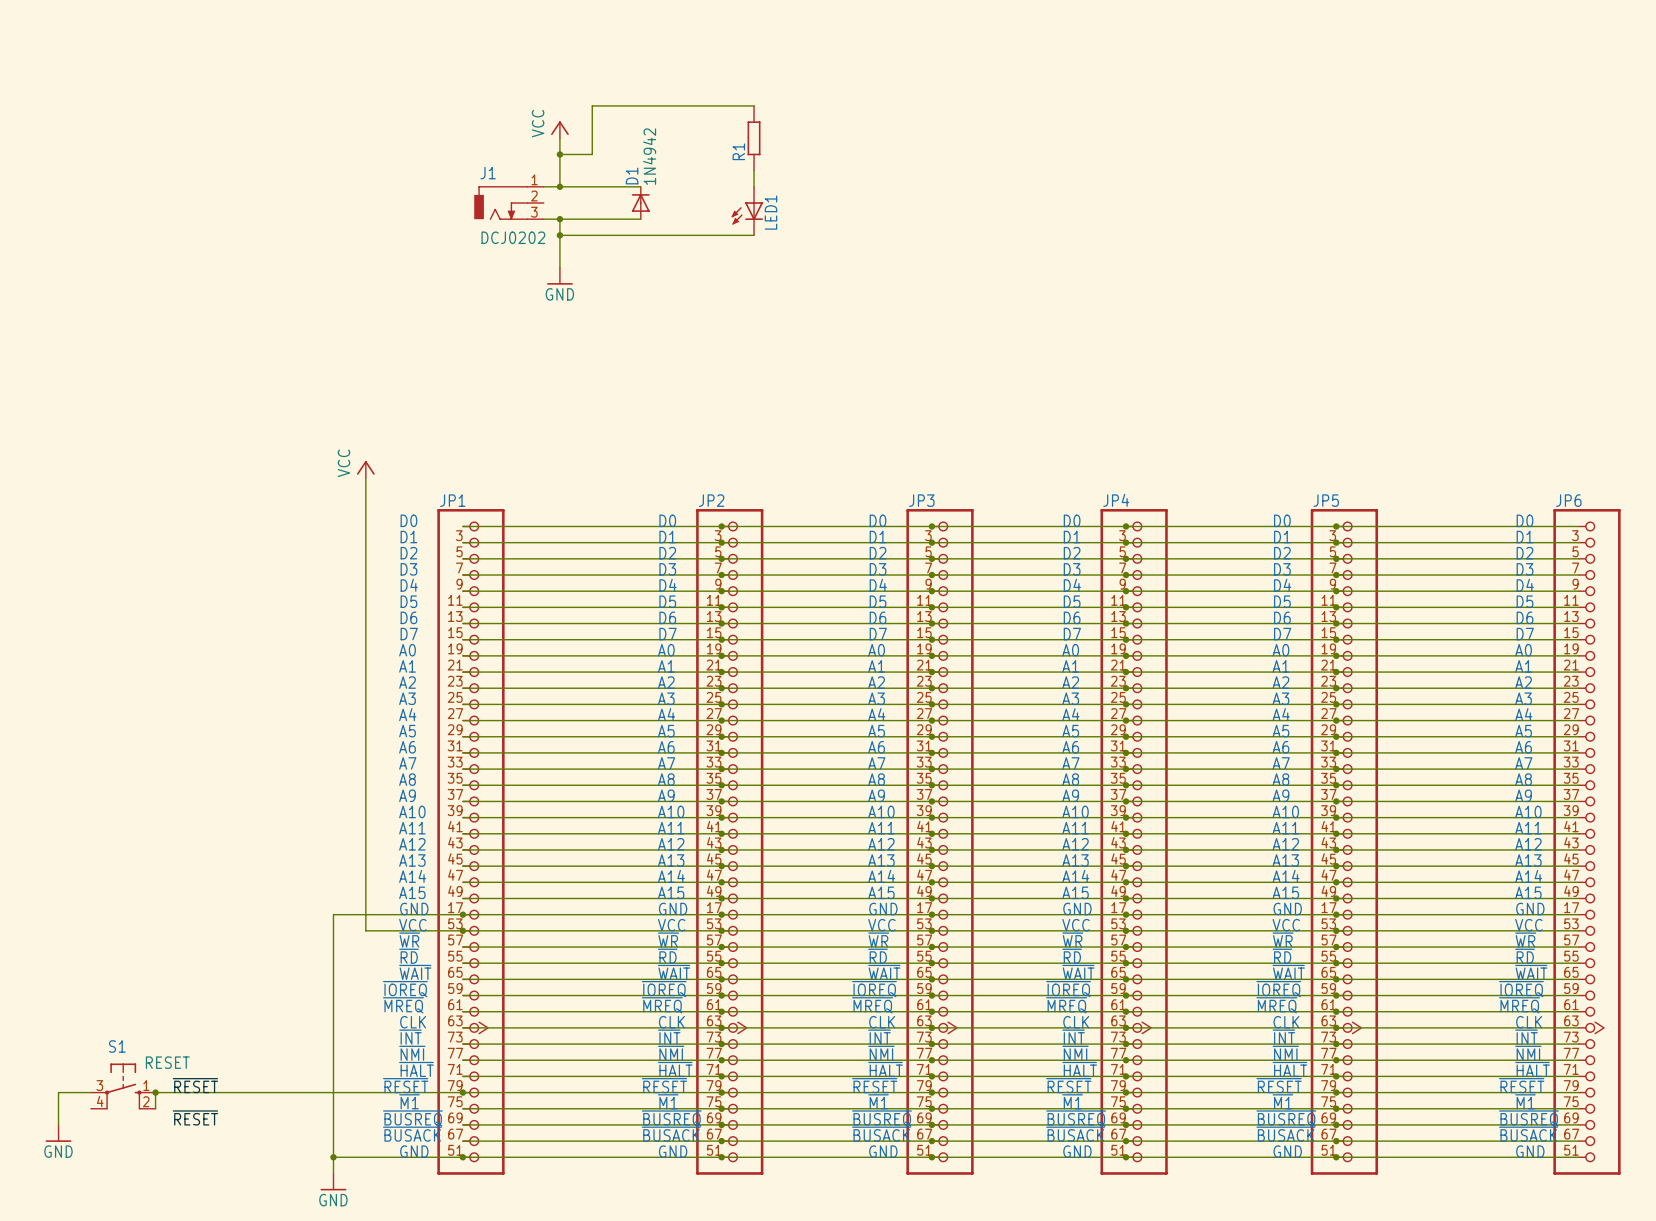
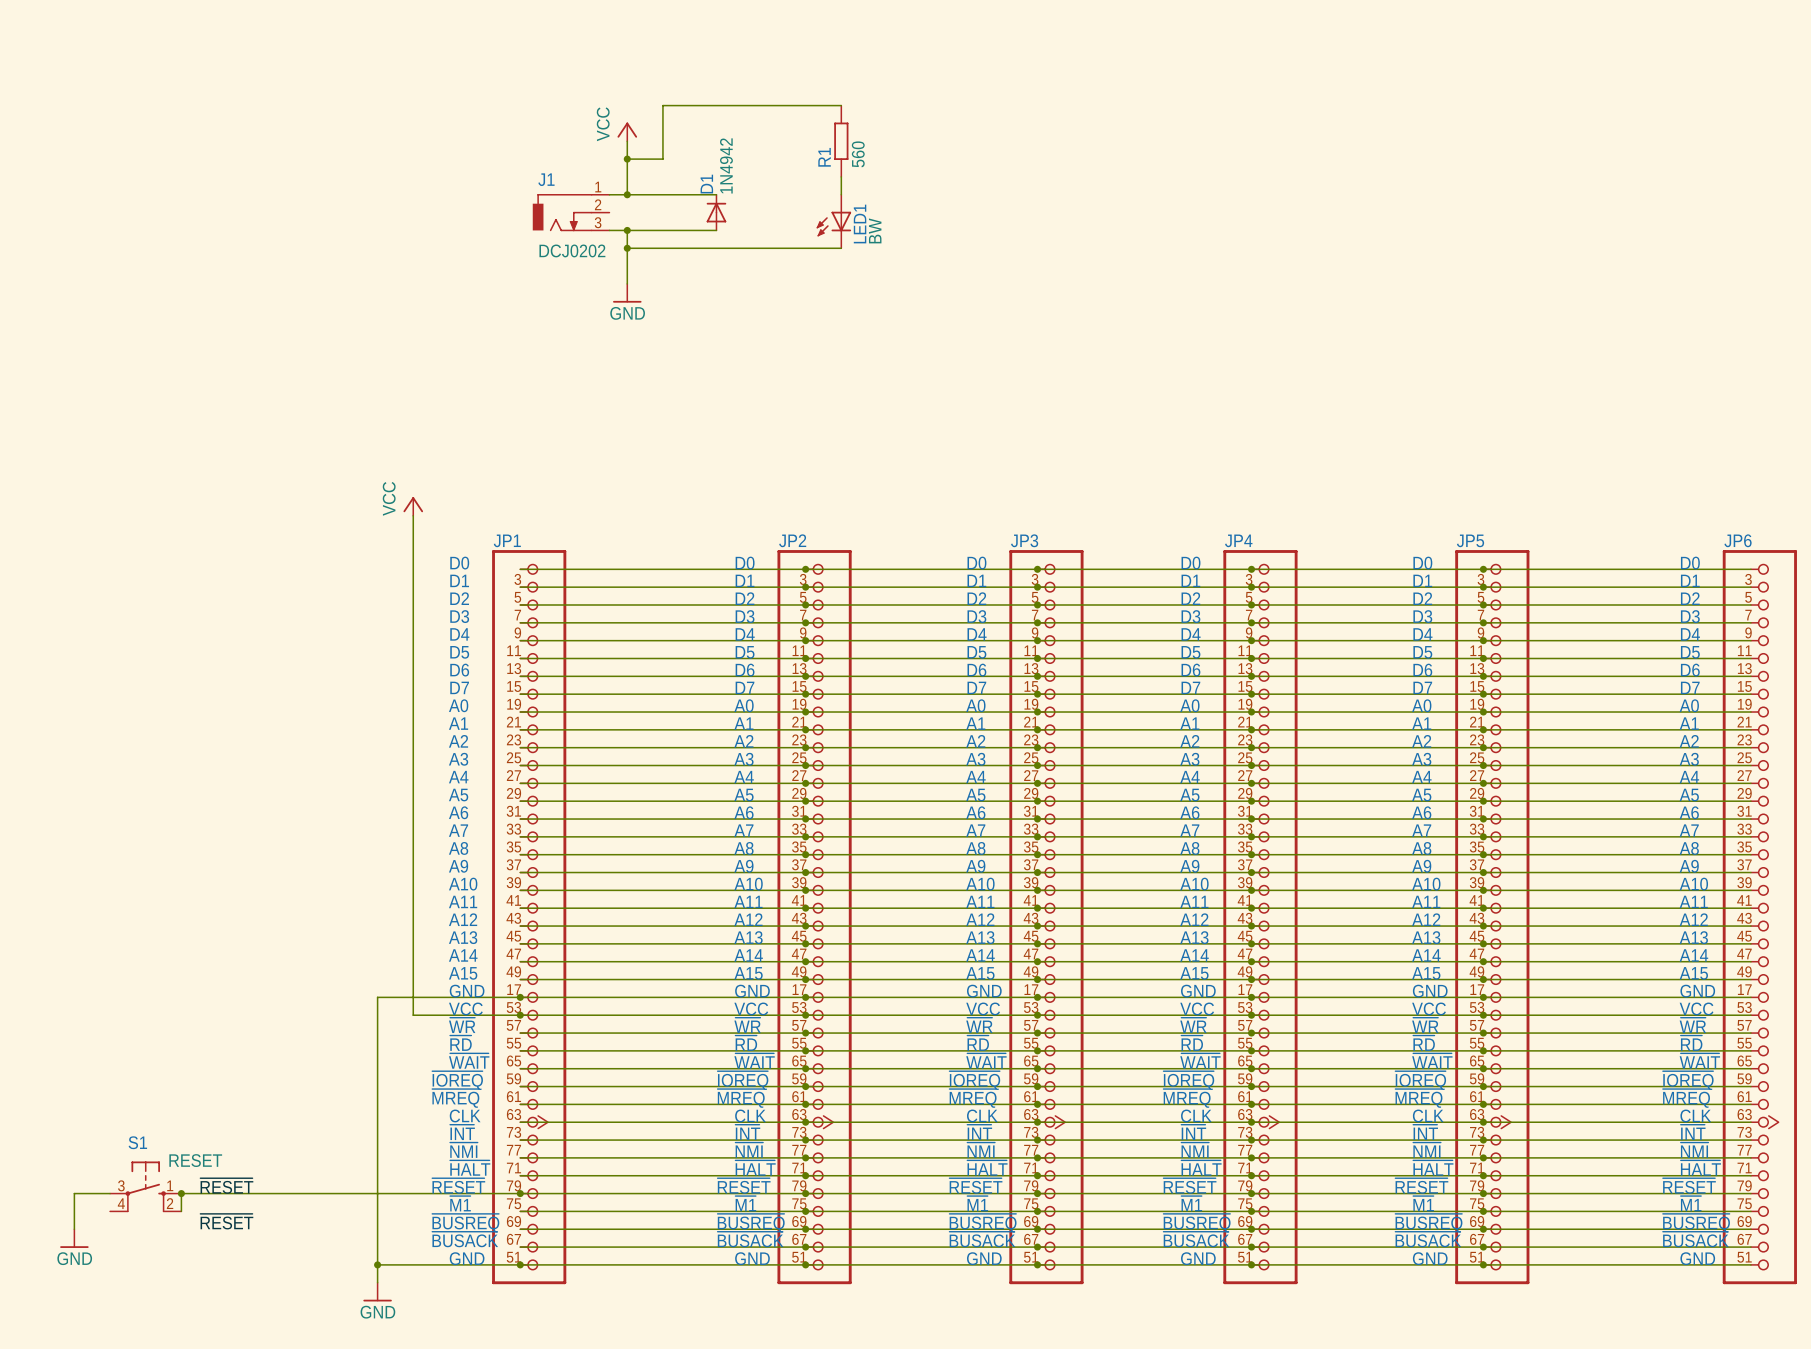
R1 value: none -> 560 (858, 154)
LED1 value: none -> BW (875, 230)

